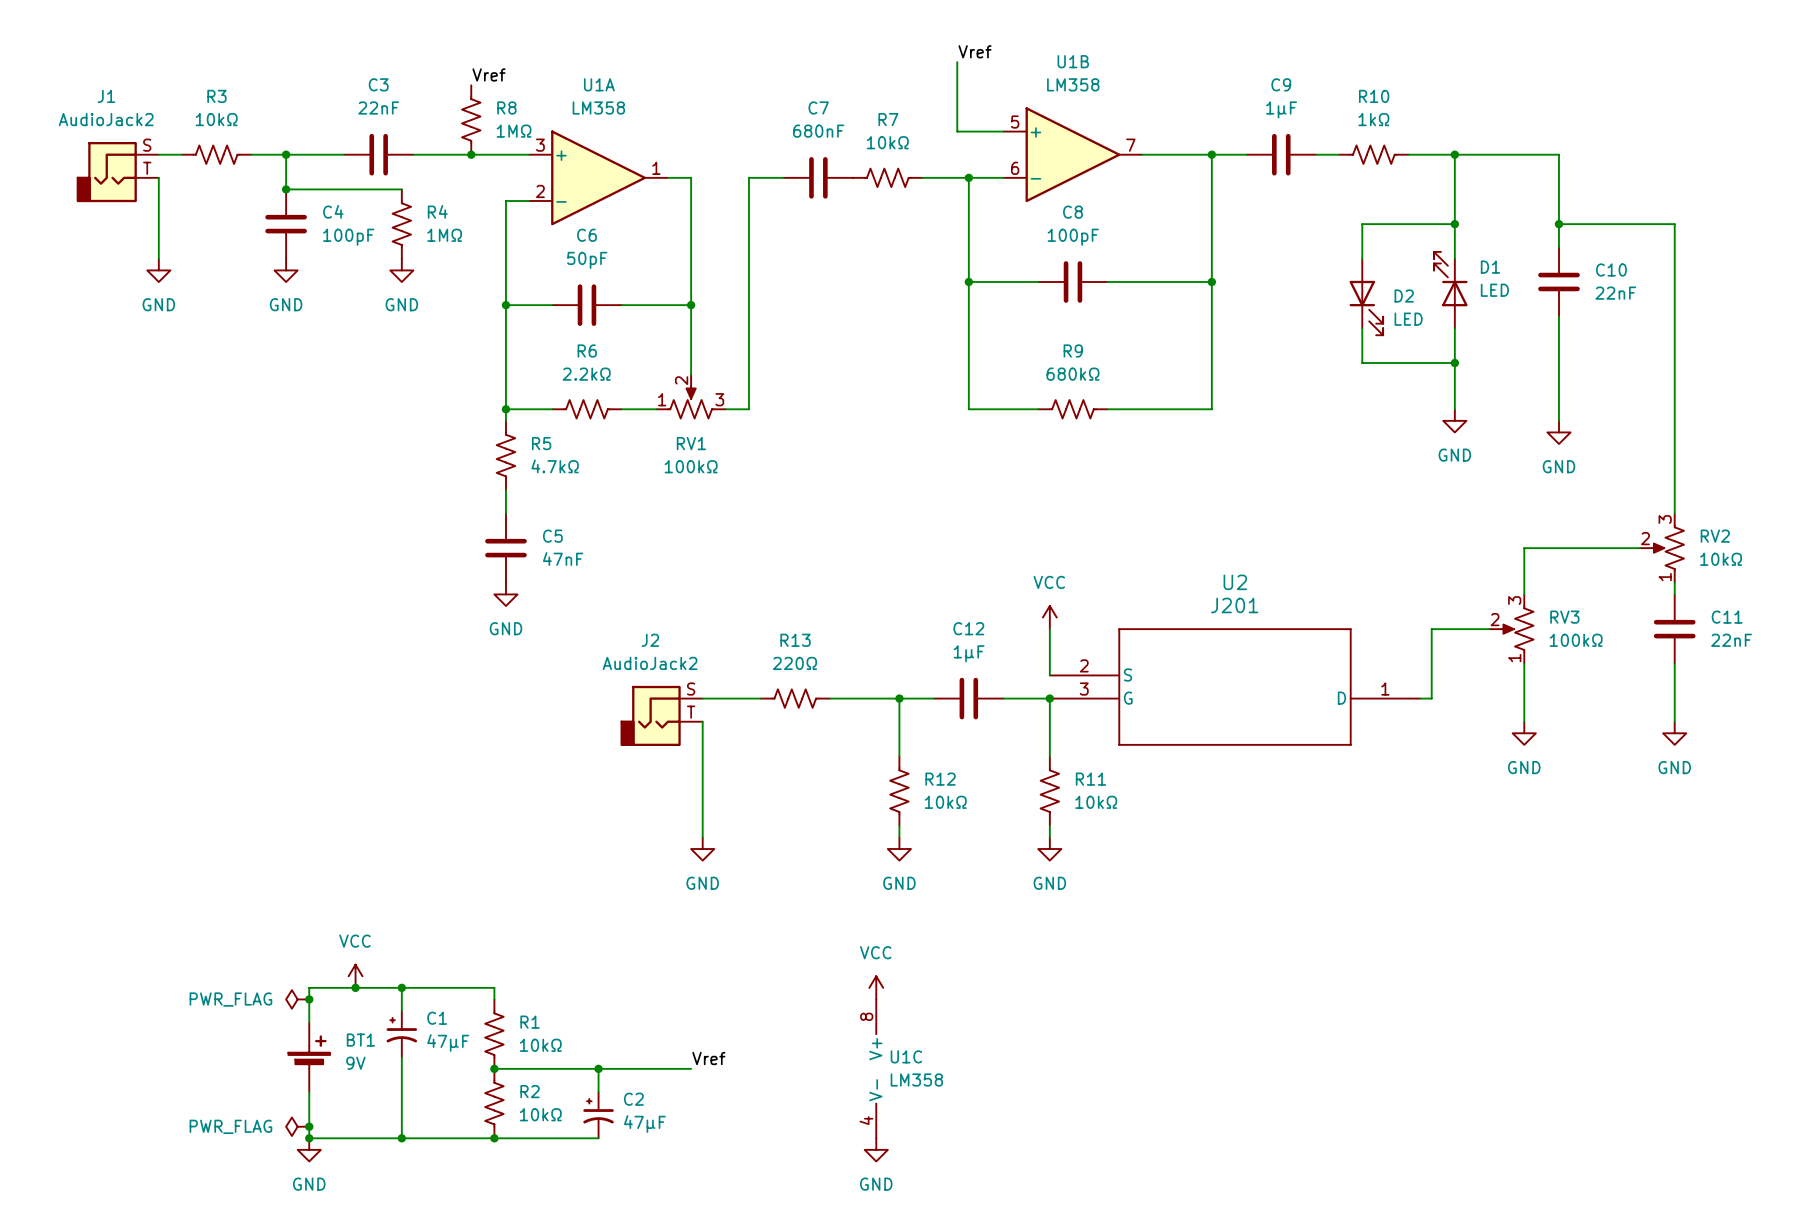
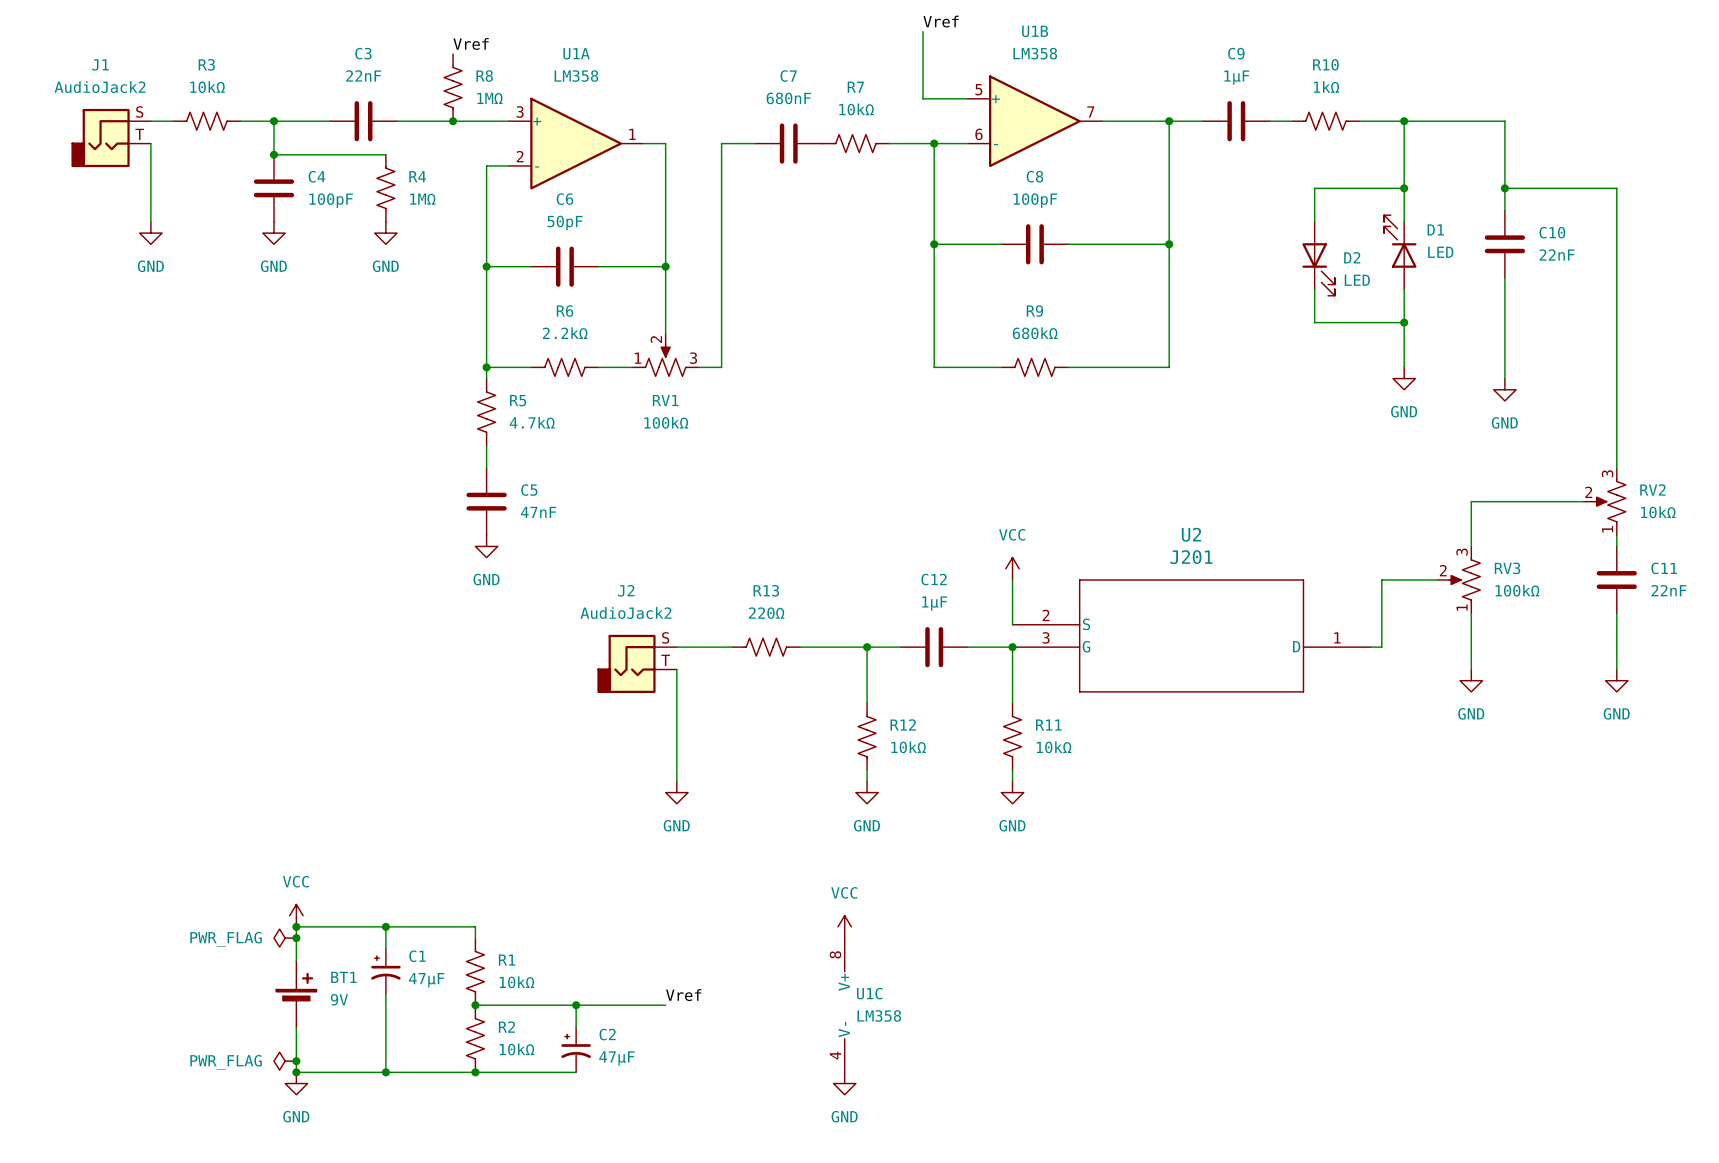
power symbol position: VCC (355, 976) -> VCC (296, 915)
junction position: (355, 987) -> (296, 926)

